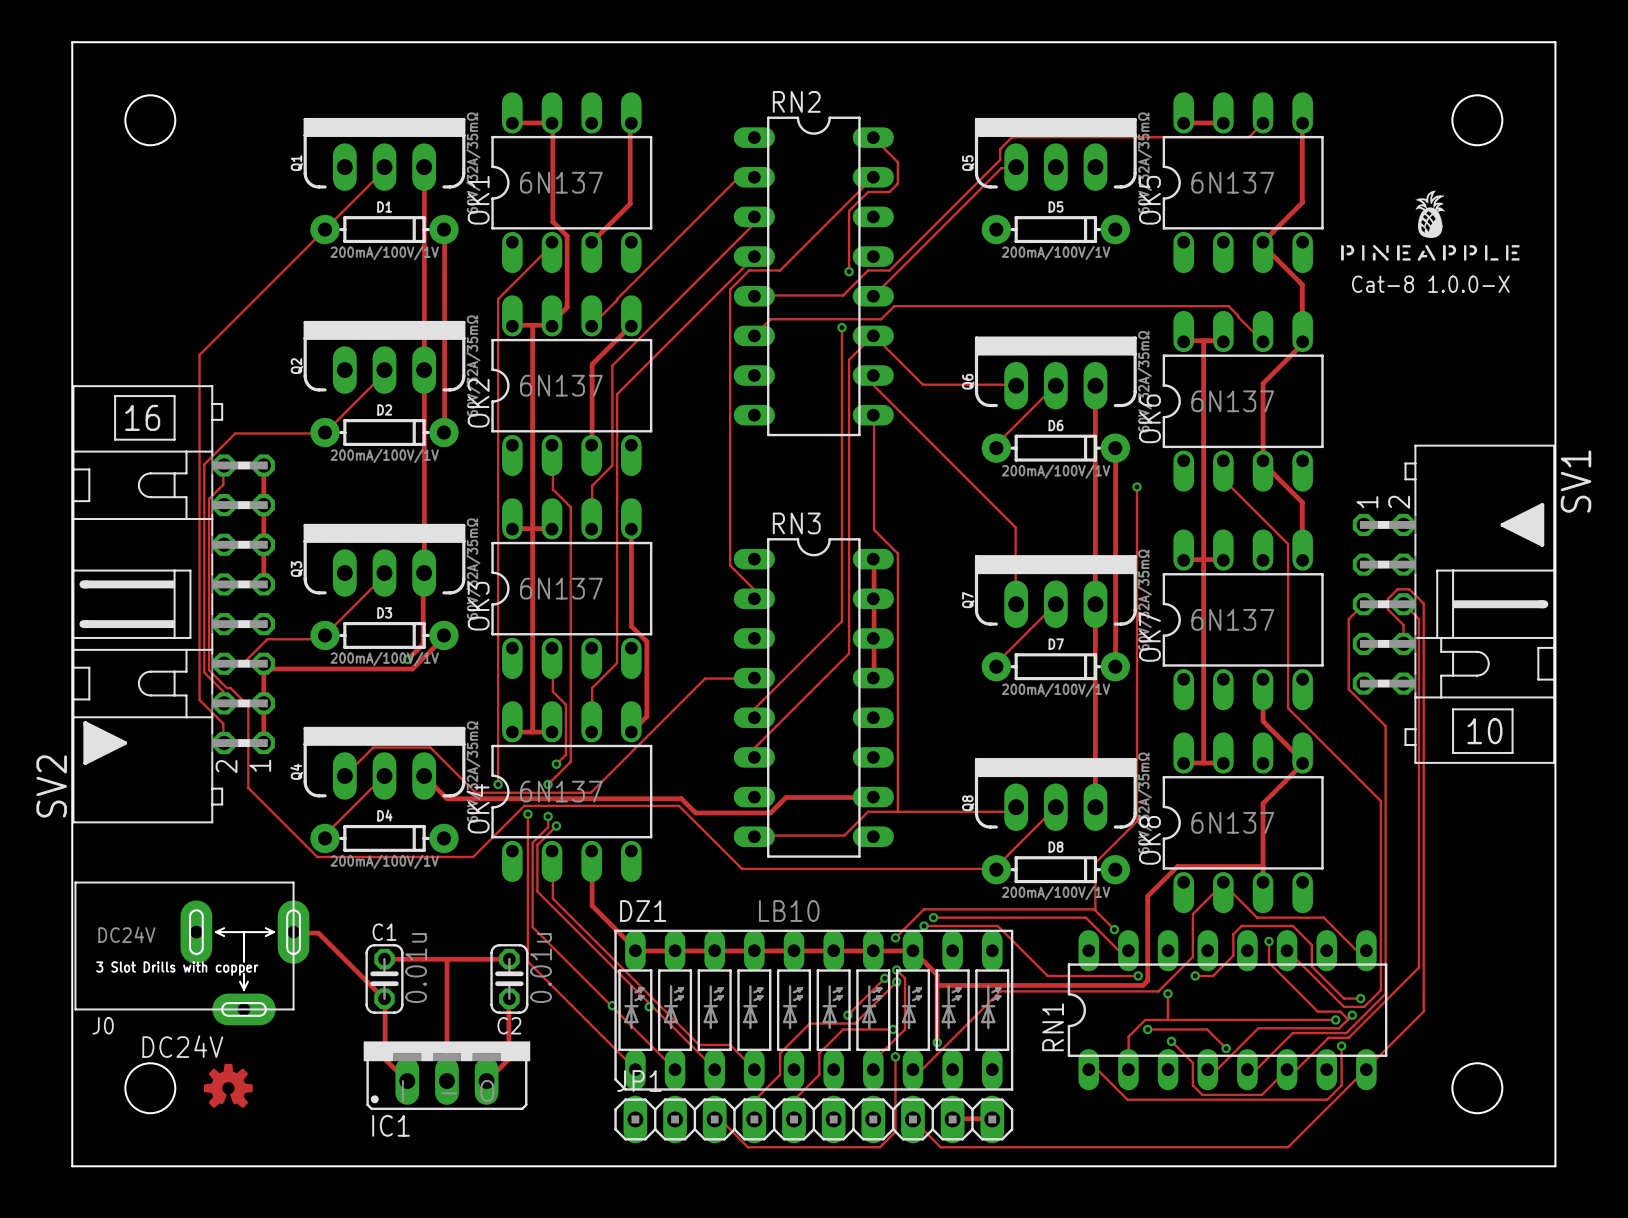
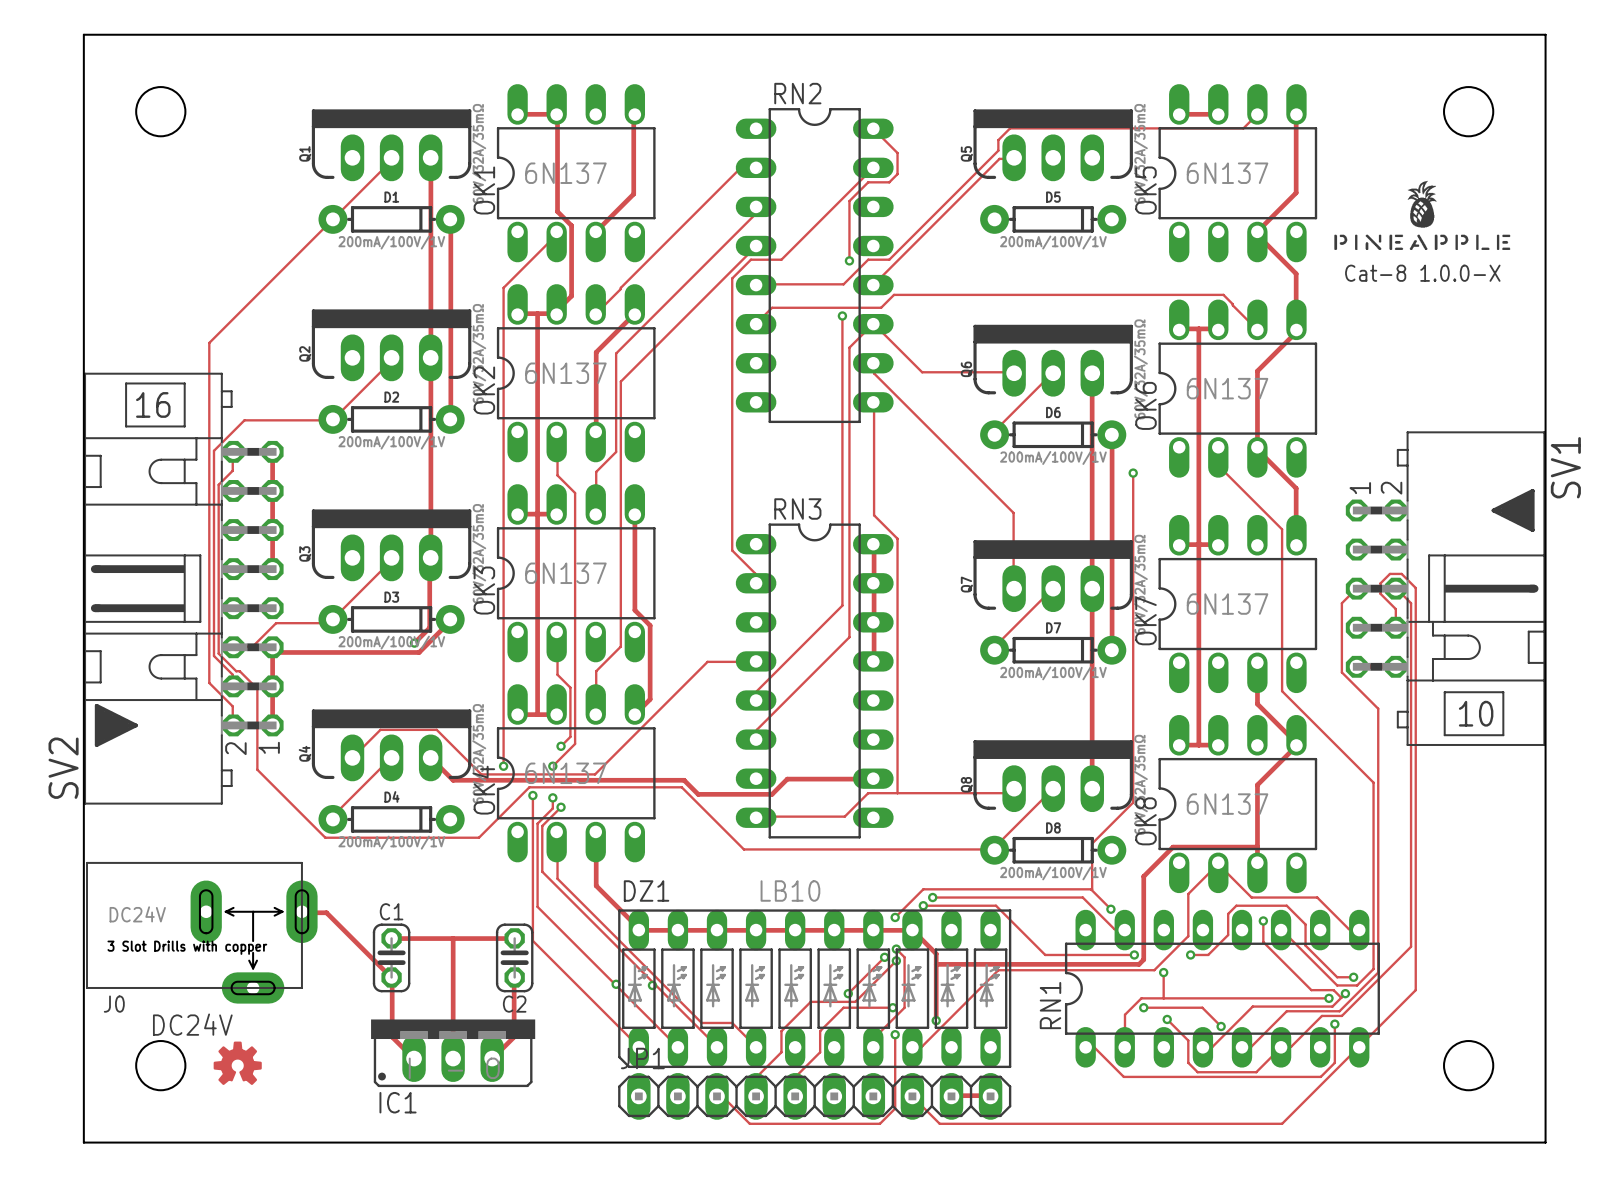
C1 value: 0.01u (416, 968) -> none
C2 value: 0.01u (541, 968) -> none

